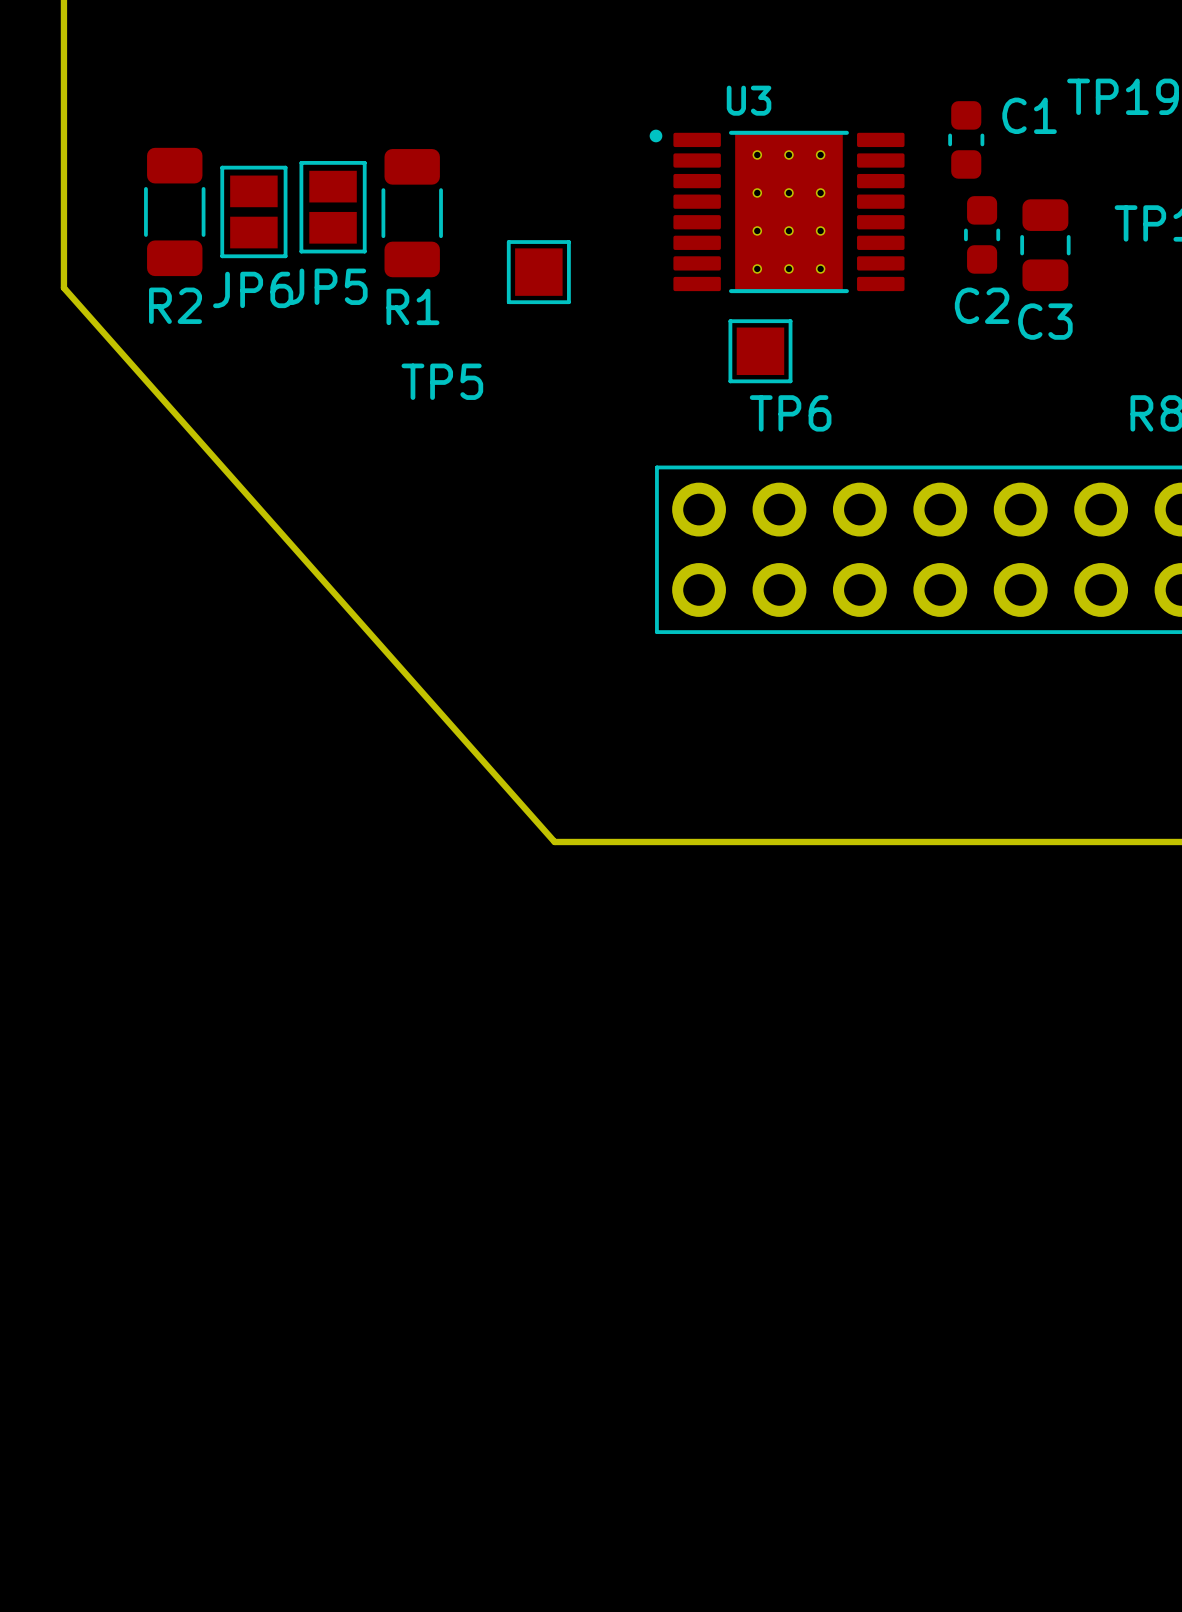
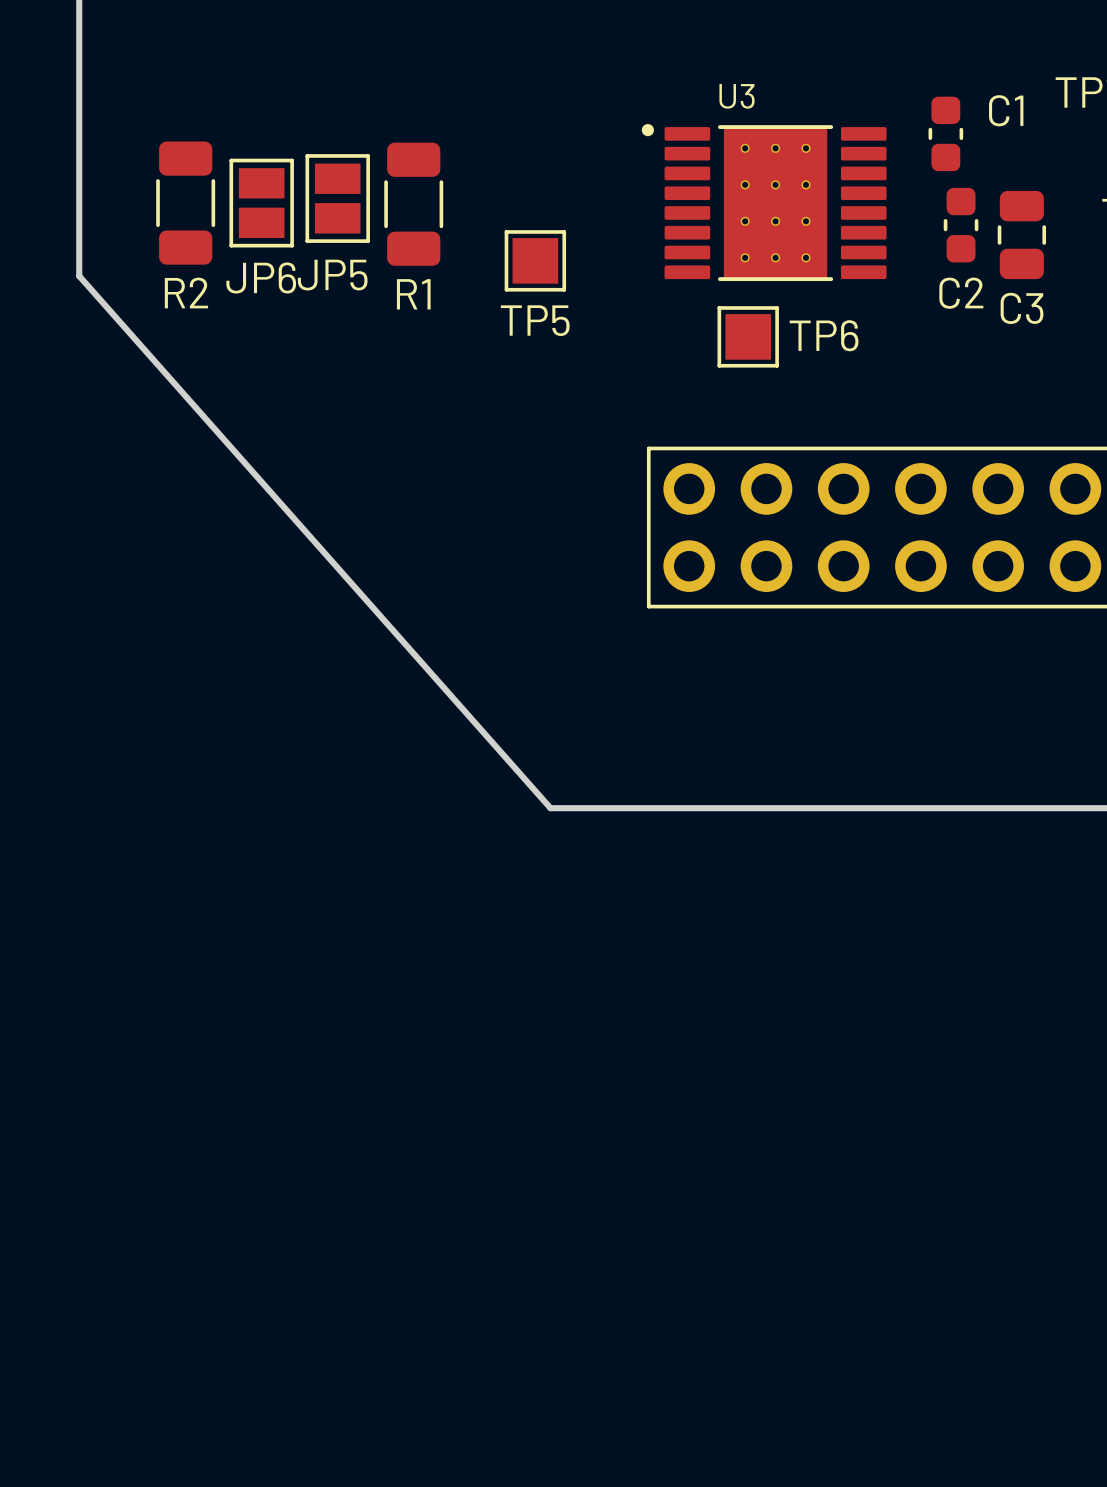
TP5 name position: TP5 (442, 381) -> TP5 (535, 320)
TP6 name position: TP6 (790, 413) -> TP6 (824, 335)

